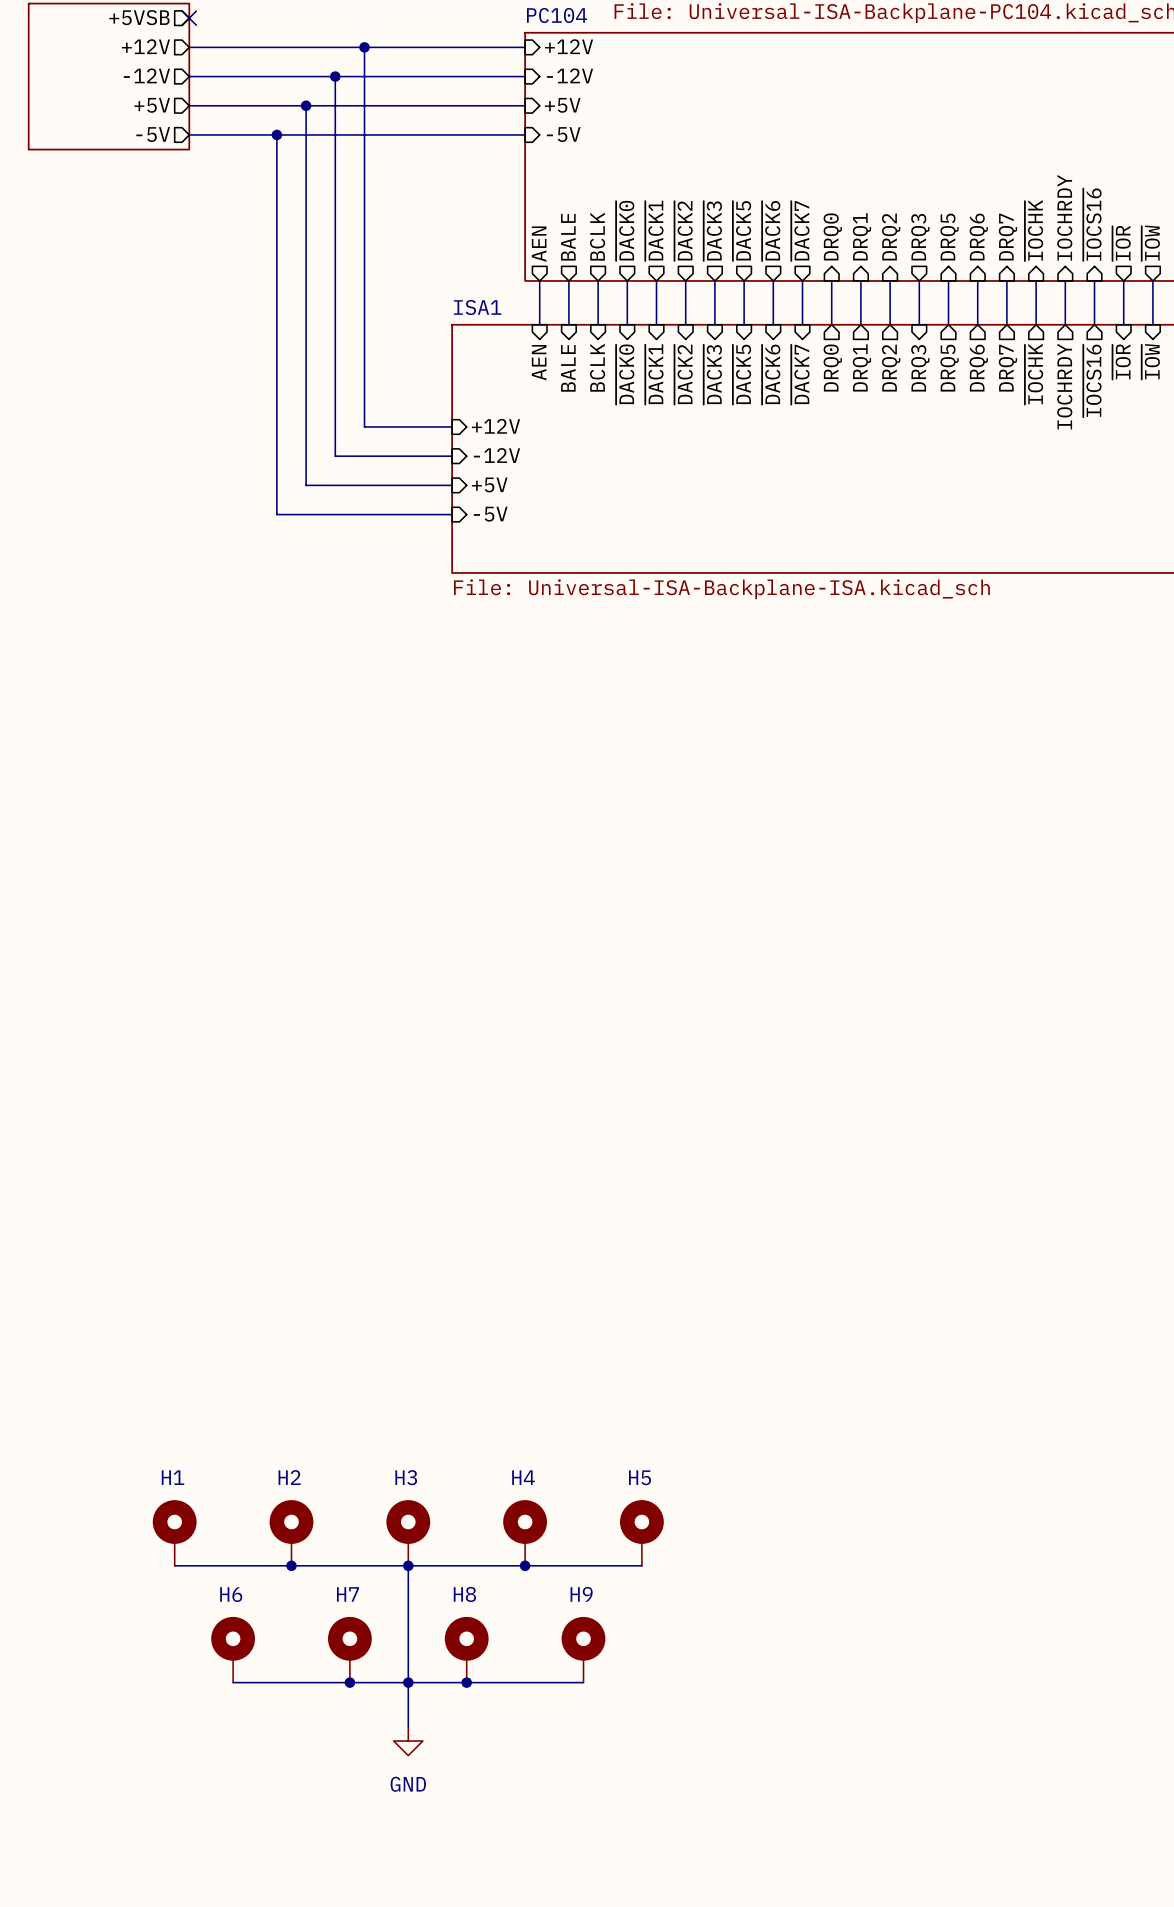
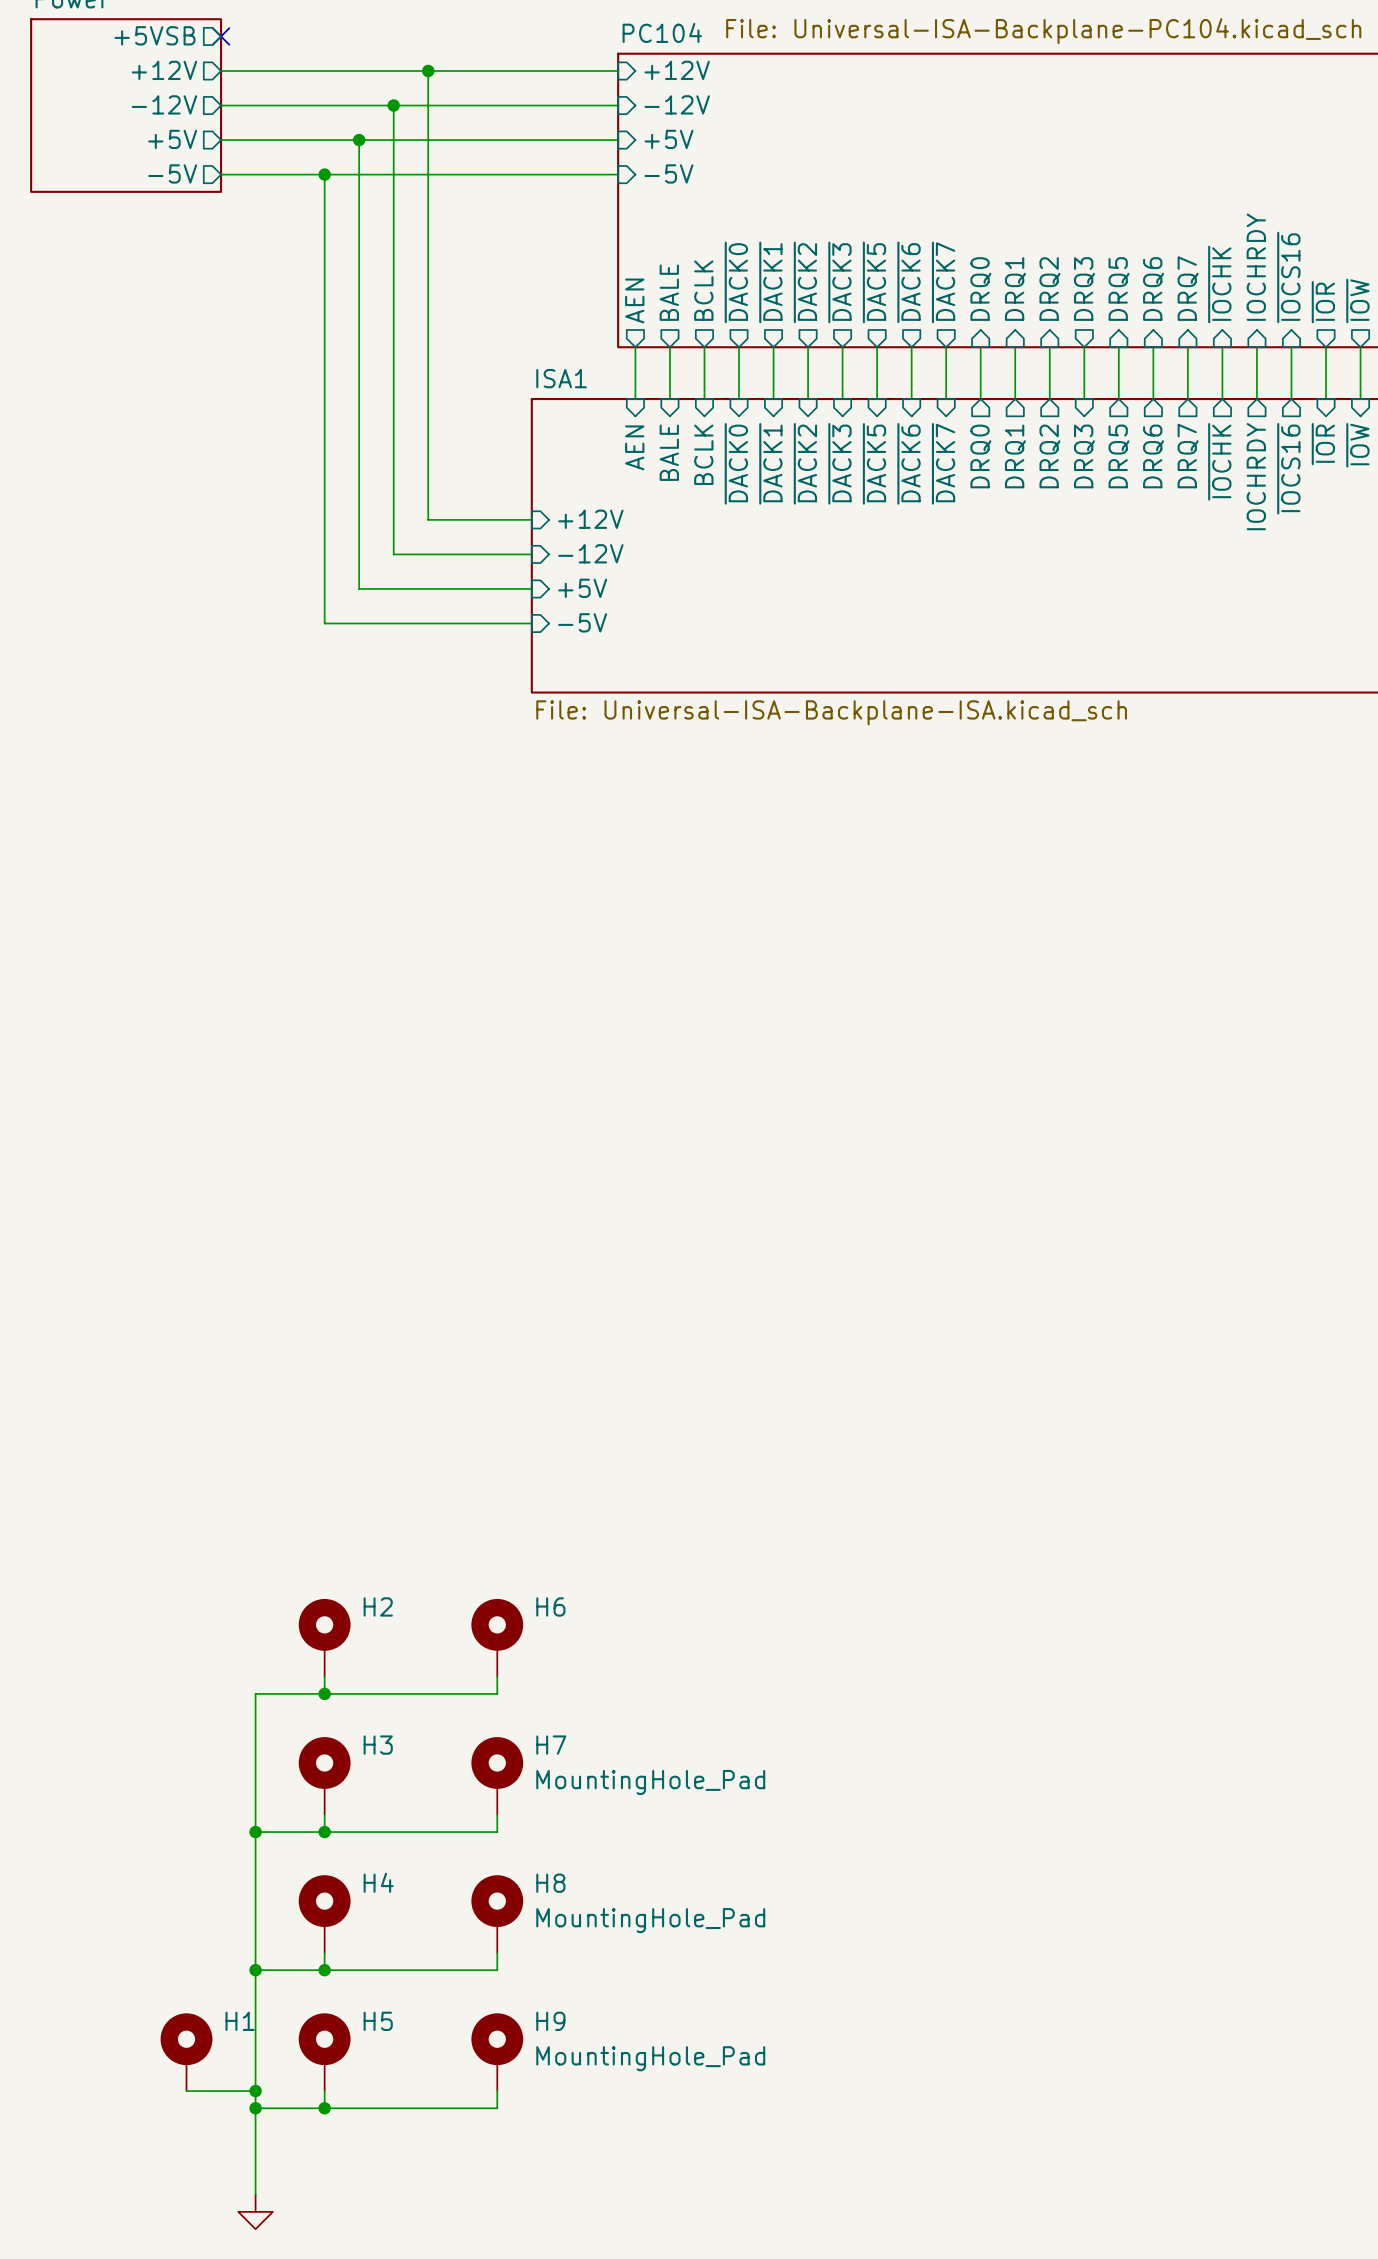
wire: none -> (324, 1676) (324, 1693)
wire: none -> (497, 1676) (497, 1693) (255, 1693) (255, 2194)
junction: none -> (324, 1693)
H1 name position: H1 (172, 1477) -> H1 (240, 2021)
H2 name position: H2 (289, 1477) -> H2 (378, 1606)
H3 name position: H3 (406, 1477) -> H3 (378, 1745)
H4 name position: H4 (523, 1477) -> H4 (378, 1882)
H5 name position: H5 (639, 1477) -> H5 (378, 2021)
H7 value: none -> MountingHole_Pad (650, 1782)
wire: none -> (497, 1814) (497, 1832) (255, 1832)
H1 position: (174, 1532) -> (186, 2052)
H2 position: (291, 1532) -> (324, 1637)
H3 position: (408, 1532) -> (324, 1775)
H4 position: (525, 1532) -> (324, 1914)
H5 position: (641, 1532) -> (324, 2052)
junction: none -> (255, 1832)
wire: (174, 1565) (641, 1565) -> none
junction position: (291, 1565) -> (324, 1832)
wire: (408, 1565) (408, 1726) -> none
junction: (408, 1565) -> none
junction: (525, 1565) -> none
H6 name position: H6 (231, 1594) -> H6 (550, 1606)
H7 name position: H7 (347, 1594) -> H7 (551, 1745)
H8 name position: H8 (464, 1594) -> H8 (550, 1883)
H9 name position: H9 (581, 1594) -> H9 (550, 2021)
H8 value: none -> MountingHole_Pad (650, 1920)
wire: none -> (324, 1952) (324, 1970)
wire: none -> (497, 1952) (497, 1970) (255, 1970)
H6 position: (233, 1649) -> (497, 1637)
H7 position: (349, 1649) -> (497, 1775)
H8 position: (466, 1649) -> (497, 1914)
H9 position: (583, 1649) -> (497, 2052)
junction: none -> (255, 1970)
junction: none -> (324, 1970)
wire: (233, 1682) (583, 1682) -> none
junction: (349, 1682) -> none
junction: (408, 1682) -> none
junction: (466, 1682) -> none
H9 value: none -> MountingHole_Pad (650, 2058)
power symbol: GND (408, 1741) -> none
wire: none -> (186, 2091) (255, 2091)
junction: none -> (255, 2091)
wire: none -> (324, 2091) (324, 2108)
wire: none -> (497, 2091) (497, 2108) (255, 2108)
junction: none -> (255, 2108)
junction: none -> (324, 2108)
power symbol: none -> (255, 2211)

